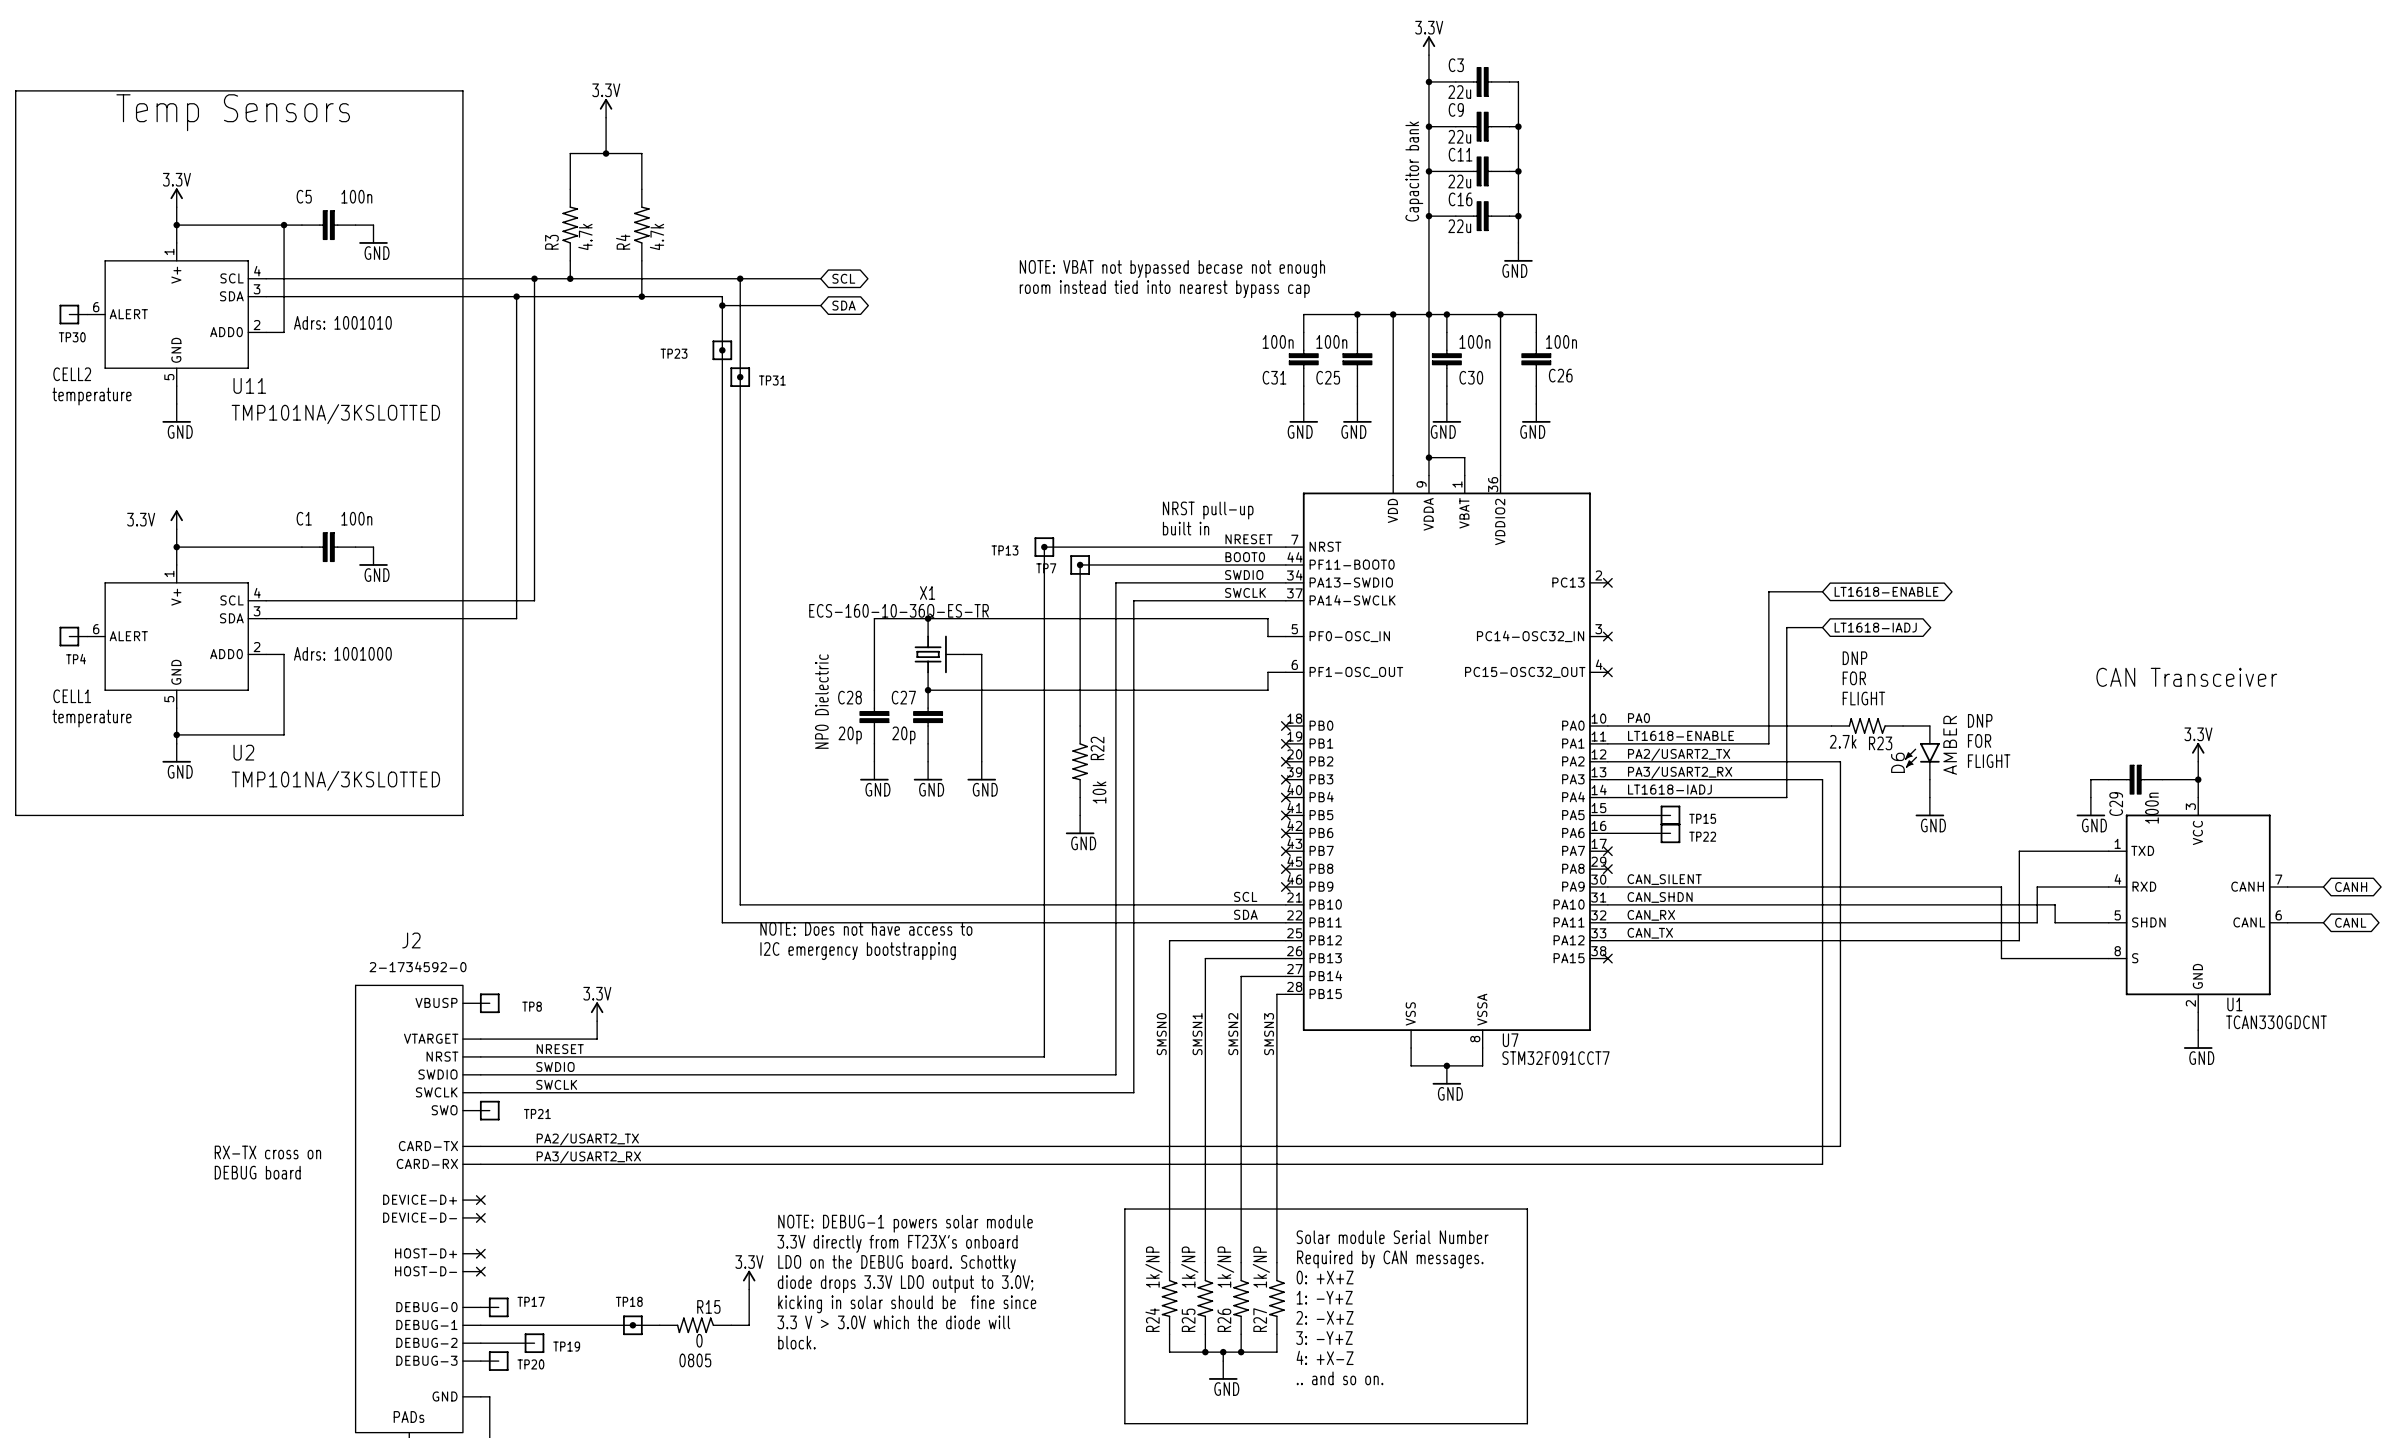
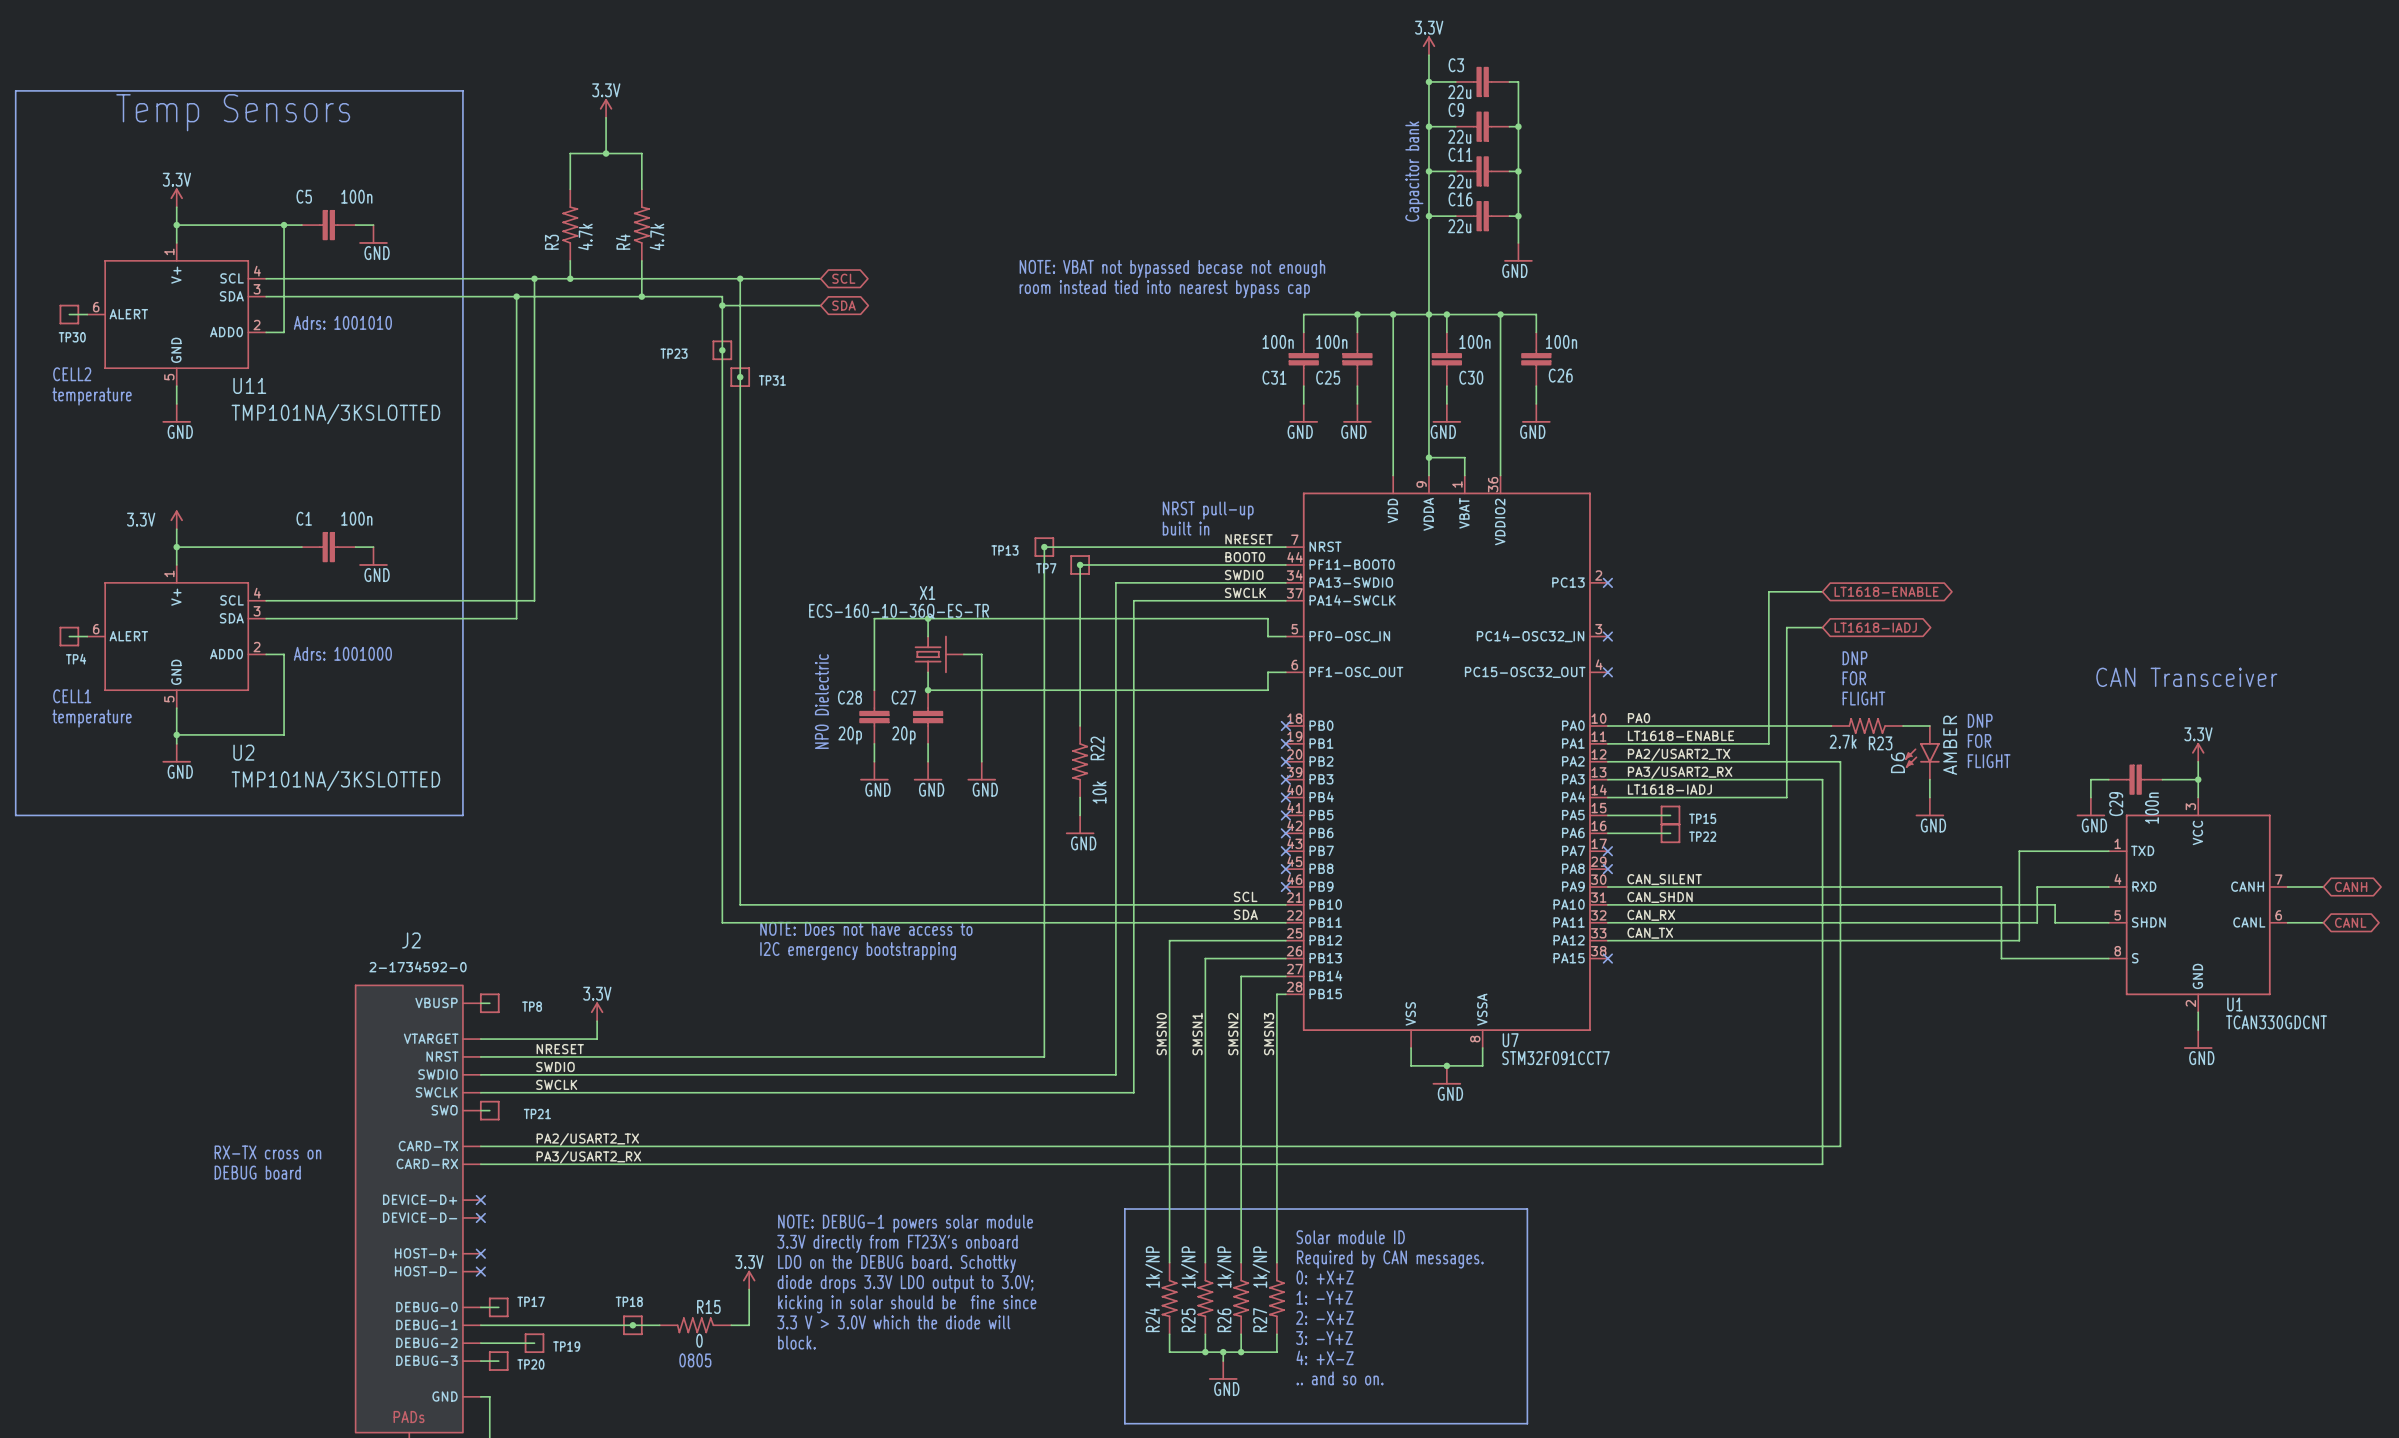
text: Solar module Serial Number (1392, 1237) -> Solar module ID (1350, 1237)

